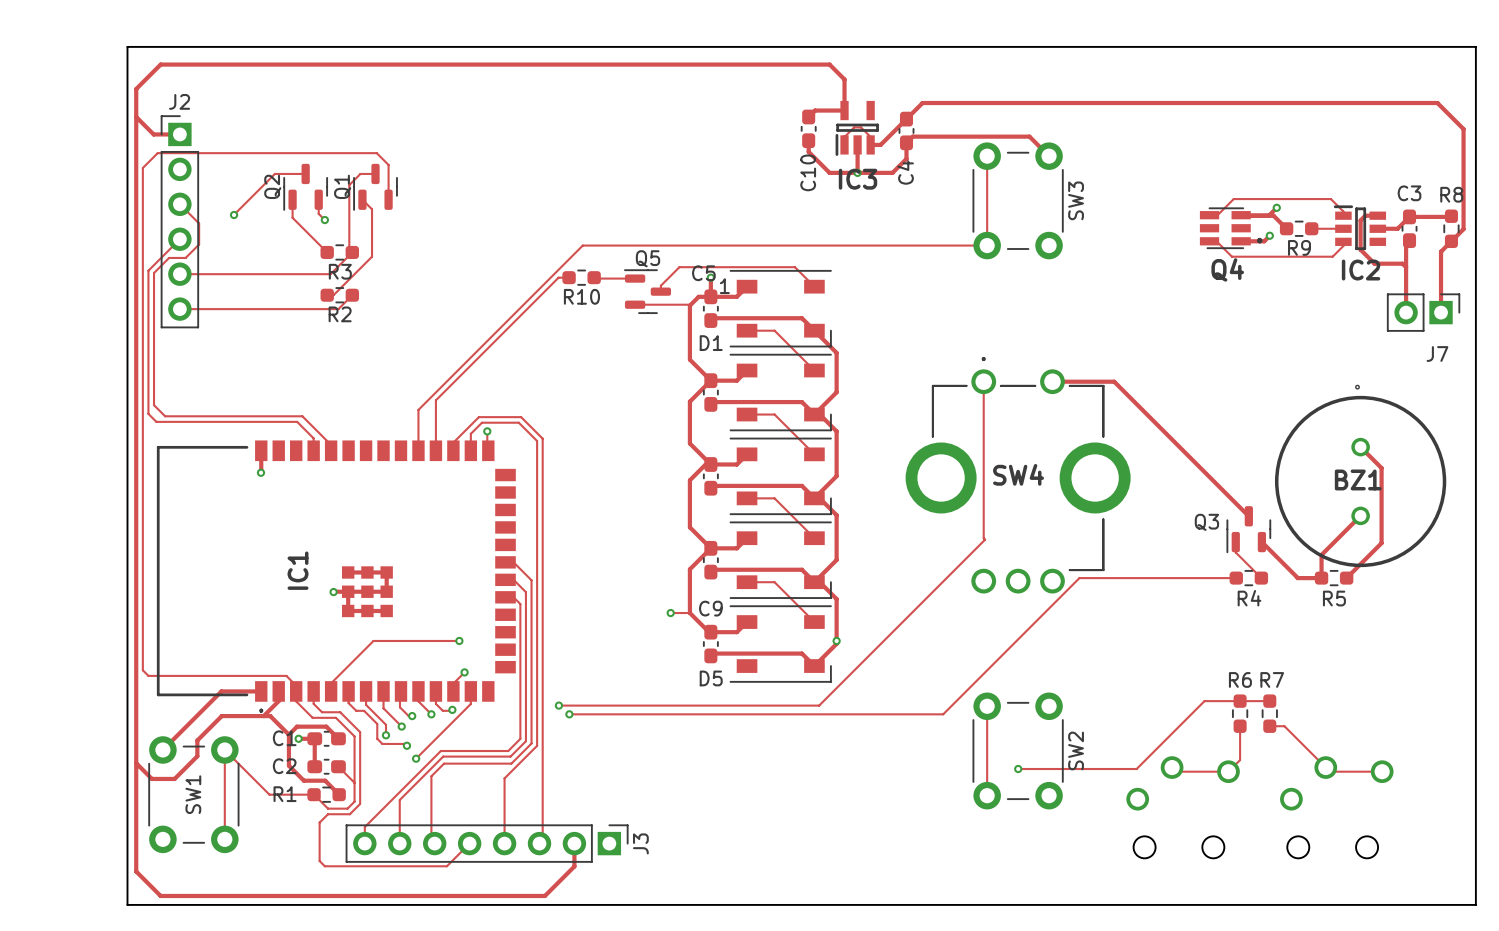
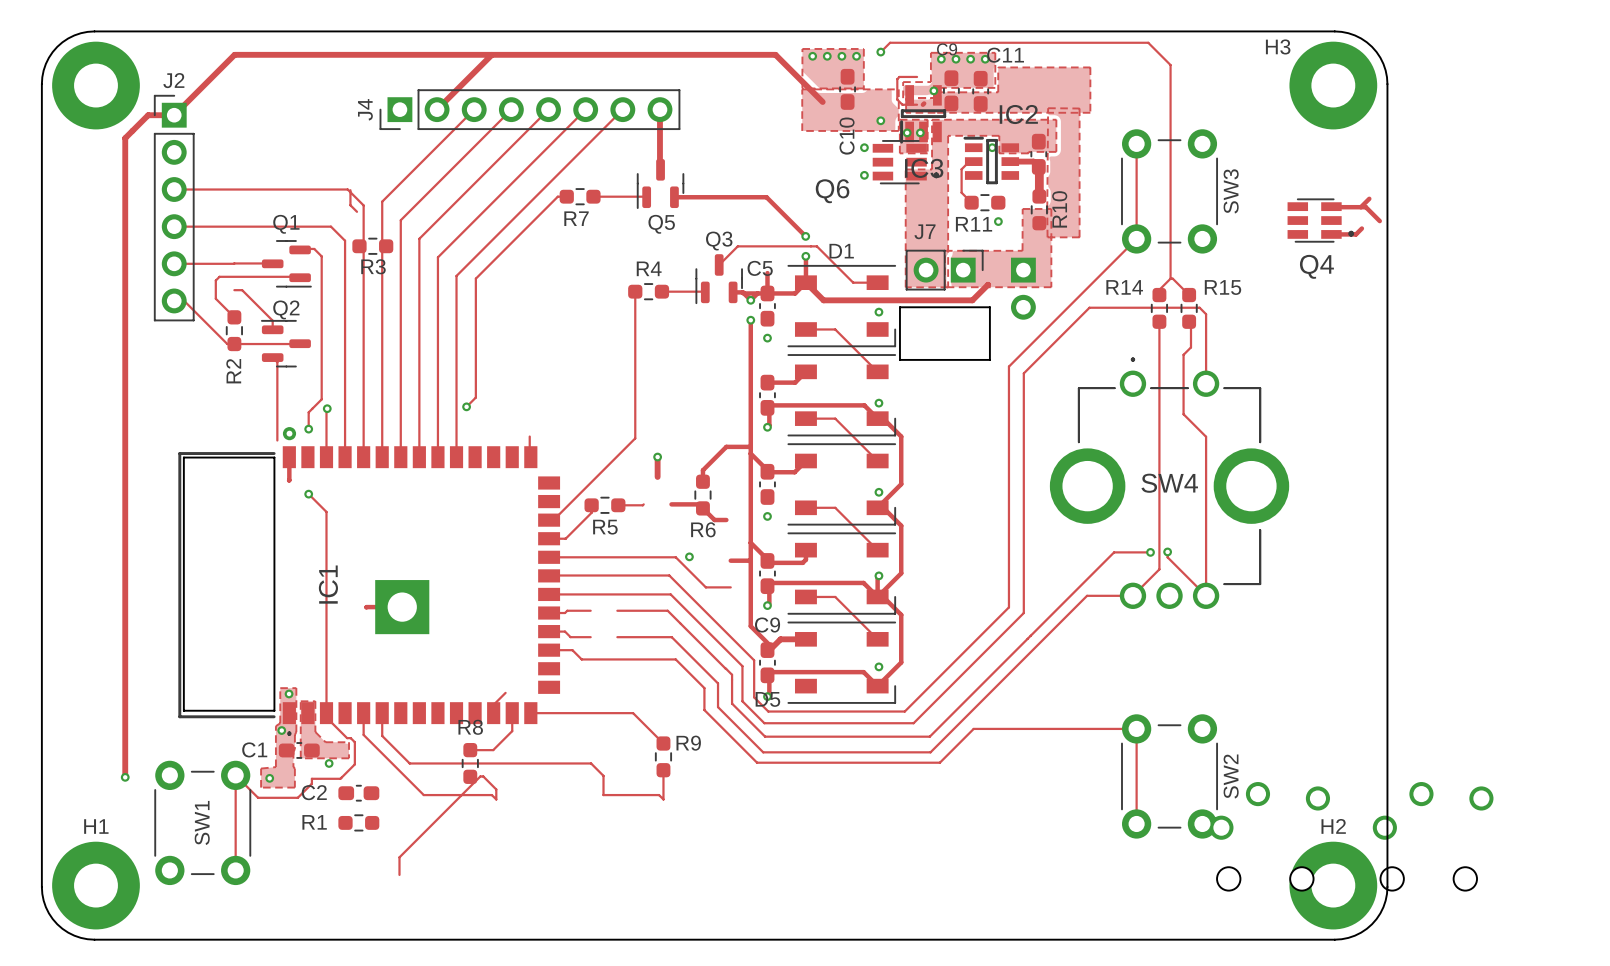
board edge: (127, 46) (1475, 46) (1475, 904) (127, 904) (127, 46) -> (94, 31) (74, 35) (57, 46) (45, 63) (41, 84) (41, 887) (43, 900) (48, 913) (62, 928) (80, 937) (94, 939) (1334, 939) (1354, 935) (1366, 928) (1376, 919) (1383, 907) (1387, 887) (1387, 84) (1385, 70) (1380, 57) (1366, 42) (1354, 35) (1334, 31) (94, 31)
zone outline: none -> (802, 48) (802, 88) (863, 88) (863, 48) (802, 48)
track: none -> (880, 52) (890, 42) (1148, 42) (1170, 65) (1170, 278)
via: none -> (880, 52)
zone outline: none -> (930, 52) (930, 82) (903, 82) (903, 98) (938, 98) (938, 87) (995, 87) (995, 52) (930, 52)
track: none -> (491, 54) (437, 109)
via: none -> (812, 56)
via: none -> (827, 56)
via: none -> (841, 56)
via: none -> (856, 56)
via: none -> (941, 59)
via: none -> (955, 59)
via: none -> (970, 59)
via: none -> (985, 59)
track: none -> (917, 76) (899, 76) (897, 79) (897, 99) (902, 104) (917, 104)
part: none -> (95, 85)
H3: none -> (1333, 85)
zone outline: none -> (802, 89) (898, 89) (898, 130) (802, 130) (802, 89)
via: none -> (933, 90)
C9: none -> (951, 90)
C11: none -> (980, 91)
zone outline: none -> (906, 98) (906, 112) (1090, 112) (1090, 67) (998, 67) (998, 92) (935, 92) (935, 98)
track: (136, 116) (153, 134) (179, 134) -> none
track: none -> (822, 101) (775, 54) (234, 54) (174, 115) (148, 115) (125, 138) (125, 777)
track: (808, 116) (815, 110) (844, 110) (844, 79) (829, 64) (160, 64) (136, 89) (136, 871) (160, 895) (544, 895) (574, 866) (574, 843) -> none
track: none -> (924, 103) (922, 104)
zone outline: none -> (1048, 108) (1047, 237) (1079, 237) (1079, 108) (1048, 108)
track: none -> (474, 109) (382, 201) (382, 457)
track: none -> (511, 109) (400, 220) (400, 457)
J4: none -> (529, 109)
track: none -> (548, 109) (419, 238) (419, 457)
track: none -> (585, 109) (437, 257) (437, 457)
track: none -> (659, 109) (660, 169)
C10 position: (808, 128) -> (847, 89)
C4: (906, 130) -> none
zone outline: none -> (899, 119) (927, 119) (927, 153) (899, 153) (899, 119)
zone outline: none -> (932, 119) (1056, 119) (1056, 151) (999, 153) (999, 135) (948, 135) (948, 287) (905, 287) (905, 169) (932, 169) (932, 119)
via: none -> (880, 120)
track: (871, 137) (861, 127) (854, 127) (844, 137) (844, 144) -> none
track: (808, 140) (808, 151) (829, 172) (892, 172) (906, 158) (906, 142) (912, 136) (1029, 136) (1049, 156) -> none
track: (857, 144) (857, 172) -> none
track: (870, 144) (880, 144) (922, 103) (1437, 103) (1463, 129) (1463, 229) (1441, 251) (1441, 312) -> none
via: none -> (907, 132)
via: none -> (920, 132)
track: (987, 156) (987, 245) (582, 245) (418, 409) -> (622, 109) (456, 275) (456, 413)
via: none -> (864, 147)
via: none -> (992, 147)
part: none -> (1038, 154)
via: (857, 172) -> none
track: none -> (973, 161) (969, 161) (961, 169) (961, 192) (971, 202)
track: none -> (1010, 161) (1033, 161) (1039, 167) (1039, 196)
track: (305, 173) (274, 173) (234, 214) -> none
track: (375, 173) (360, 173) (349, 185) (349, 249) (352, 252) (330, 274) (179, 274) -> none
Q6: none -> (905, 162)
via: none -> (864, 175)
Q1 name position: Q1 (342, 186) -> Q1 (286, 224)
Q2 rotation: 0° (305, 187) -> 90° clockwise (285, 343)
Q2 position: (305, 187) -> (285, 343)
Q1 rotation: 0° (375, 187) -> 90° counterclockwise (286, 263)
Q1 position: (375, 187) -> (286, 263)
track: (292, 199) (292, 217) (327, 252) -> none
track: (362, 199) (372, 209) (372, 256) (333, 295) (327, 295) -> none
track: (388, 199) (388, 164) (376, 153) (157, 153) (142, 167) (142, 670) (148, 675) (286, 675) (296, 685) -> (308, 494) (326, 511) (326, 706)
SW3 position: (1018, 200) -> (1169, 191)
track: (179, 204) (199, 223) (199, 244) (185, 257) (169, 257) (154, 273) (154, 405) (165, 416) (302, 416) (331, 444) -> (184, 189) (347, 189) (363, 205) (363, 451)
track: none -> (566, 196) (557, 196) (475, 278) (475, 397) (466, 406)
track: none -> (593, 196) (646, 197)
track: none -> (674, 197) (766, 197) (805, 236)
via: (1276, 207) -> none
R11: none -> (984, 202)
via: (234, 214) -> none
track: (1217, 215) (1233, 199) (1330, 199) (1343, 211) (1343, 215) -> none
track: (1377, 215) (1365, 215) (1360, 220) (1360, 249) (1374, 263) (1402, 263) (1406, 267) -> none
track: (1451, 216) (1409, 216) (1397, 228) (1377, 228) -> none
zone outline: none -> (1022, 208) (1022, 250) (945, 250) (945, 287) (1051, 287) (1051, 208) (1022, 208)
via: (324, 220) -> none
J2 position: (179, 221) -> (174, 208)
IC2 position: (1359, 227) -> (991, 160)
R9 rotation: 0° (1299, 228) -> 90° clockwise (663, 756)
R9 position: (1299, 228) -> (663, 756)
track: (1311, 228) (1343, 228) -> none
C3: (1409, 228) -> none
R8 position: (1451, 228) -> (470, 763)
via: none -> (998, 221)
via: (1269, 235) -> none
track: (179, 239) (148, 270) (148, 413) (156, 421) (297, 421) (313, 438) -> (184, 226) (330, 226) (345, 240) (345, 443)
track: (1409, 240) (1406, 244) (1406, 312) -> none
track: (1217, 241) (1231, 256) (1332, 256) (1343, 245) (1343, 241) -> none
via: none -> (805, 236)
R9 name position: R9 (1299, 247) -> R9 (688, 743)
track: none -> (300, 249) (314, 248) (321, 256) (321, 399) (308, 412) (308, 429)
Q5 name position: Q5 (647, 258) -> Q5 (661, 224)
via: none -> (805, 256)
track: none -> (805, 256) (805, 282) (823, 300) (972, 300) (987, 284)
track: none -> (184, 263) (272, 263)
IC2 name position: IC2 (1361, 270) -> IC2 (1018, 114)
track: (569, 277) (558, 277) (435, 400) (435, 450) -> none
R10 rotation: 0° (581, 277) -> 90° clockwise (1039, 209)
R10 position: (581, 277) -> (1039, 209)
track: (594, 277) (635, 278) -> none
via: (710, 277) -> none
track: none -> (300, 277) (219, 276) (215, 280) (215, 298) (234, 317)
track: none -> (1170, 278) (1189, 295)
track: none -> (1170, 278) (1159, 289) (1159, 295)
D1 text: 1 (724, 286) -> none
track: (814, 286) (794, 267) (679, 267) (660, 285) (660, 291) -> (877, 282) (853, 282) (816, 246) (737, 246) (719, 264)
Q5 rotation: 0° (647, 291) -> 90° counterclockwise (660, 183)
Q5 position: (647, 291) -> (660, 183)
part: none -> (1023, 288)
track: none -> (234, 290) (242, 290) (272, 320) (272, 329)
R2 rotation: 0° (339, 295) -> 90° clockwise (234, 330)
R2 position: (339, 295) -> (234, 330)
track: (352, 295) (338, 309) (179, 309) -> none
track: none -> (635, 291) (635, 438) (553, 520) (549, 520)
track: none -> (661, 291) (705, 292)
track: none -> (733, 292) (742, 292) (750, 300) (757, 293)
R10 name position: R10 (581, 296) -> R10 (1059, 209)
track: (698, 296) (689, 305) (689, 359) (710, 380) (689, 401) (689, 443) (710, 464) -> (754, 293) (743, 293)
track: none -> (184, 300) (227, 344) (300, 343)
via: none -> (750, 300)
track: (635, 304) (689, 304) -> none
board edge: none -> (899, 307) (899, 359) (989, 359) (989, 307) (899, 307)
R14: none -> (1159, 308)
R15: none -> (1189, 308)
J7 position: (1423, 312) -> (944, 270)
via: none -> (878, 312)
track: (710, 320) (713, 318) (801, 318) (836, 352) (836, 392) (814, 414) -> none
via: none -> (750, 320)
track: none -> (1159, 321) (1159, 569) (1132, 595) (1087, 595) (930, 752) (763, 752) (718, 707) (718, 683) (671, 637) (617, 637)
track: none -> (1189, 321) (1191, 323) (1191, 347) (1183, 354) (1183, 414) (1206, 436) (1206, 595) (1167, 557) (1167, 551)
via: none -> (767, 338)
D1 name position: D1 (711, 343) -> D1 (841, 251)
J7 name position: J7 (1437, 354) -> J7 (925, 231)
track: none -> (272, 357) (277, 362) (277, 440)
track: (983, 381) (985, 539) (819, 705) (558, 705) -> none
track: (1052, 381) (1114, 381) (1248, 516) -> none
via: none -> (878, 403)
via: none -> (466, 406)
track: none -> (769, 407) (769, 425) (767, 427)
track: none -> (327, 408) (326, 457)
via: none -> (327, 408)
via: none -> (767, 427)
via: none -> (308, 429)
via: none -> (289, 433)
via: (487, 431) -> none
IC1 footprint: [156, 440, 516, 713] -> [178, 446, 561, 736]
track: none -> (750, 447) (726, 446) (702, 470) (702, 481)
track: (1360, 447) (1381, 468) (1381, 543) (1346, 578) -> none
track: (453, 450) (453, 442) (478, 417) (521, 417) (542, 438) (542, 840) (539, 843) -> none
track: (470, 450) (470, 433) (481, 422) (518, 422) (537, 441) (537, 745) (504, 778) (504, 843) -> none
track: none -> (657, 457) (657, 476)
via: none -> (657, 457)
board edge: none -> (183, 457) (274, 457) (274, 710) (183, 710) (183, 457)
track: (736, 464) (705, 464) (689, 480) (689, 527) (710, 548) -> (795, 471) (769, 472) (750, 453)
via position: (260, 472) -> (308, 494)
SW4 position: (1018, 475) -> (1169, 483)
BZ1: (1360, 475) -> none
via: none -> (878, 492)
track: (710, 488) (713, 485) (801, 485) (814, 498) -> none
track: none -> (643, 504) (618, 505)
track: none -> (671, 504) (698, 504) (714, 520) (726, 520)
track: none -> (591, 505) (591, 512) (565, 538) (549, 538)
via: none -> (767, 516)
track: (1360, 515) (1321, 554) (1321, 578) (1297, 578) -> none
Q3 name position: Q3 (1206, 522) -> Q3 (719, 241)
Q3 position: (1248, 529) -> (719, 279)
track: (747, 538) (736, 548) (710, 548) -> (805, 550) (805, 559) (802, 562) (770, 562) (750, 542)
via: none -> (1167, 551)
track: none -> (1150, 552) (1114, 552) (929, 736) (765, 736) (732, 703) (732, 674) (726, 668)
via: none -> (1150, 552)
track: (1235, 542) (1235, 552) (1261, 578) -> none
track: (1261, 542) (1297, 577) -> none
track: none -> (549, 557) (675, 557) (705, 587) (730, 587)
via: none -> (689, 556)
track: none -> (730, 560) (750, 561)
track: (710, 548) (689, 569) (689, 613) -> none
track: (509, 562) (513, 562) (531, 580) (531, 743) (511, 763) (444, 763) (431, 776) (431, 840) (434, 843) -> (553, 575) (669, 575) (754, 660) (754, 697) (768, 711) (904, 711) (1008, 607) (1008, 366) (1136, 238) (1136, 143)
track: none -> (878, 575) (877, 596)
via: none -> (878, 575)
track: (801, 569) (713, 569) (710, 572) -> (864, 583) (773, 582) (769, 586) (769, 603)
track: (1236, 578) (1079, 578) (943, 714) (569, 714) -> none
R4 position: (1248, 578) -> (648, 291)
R5 position: (1334, 578) -> (604, 505)
track: (513, 579) (525, 592) (525, 741) (510, 756) (443, 756) (399, 800) (399, 843) -> (557, 594) (670, 594) (742, 666) (742, 701) (764, 723) (913, 723) (1023, 613) (1023, 373) (1089, 307) (1199, 307) (1206, 314) (1206, 383)
via: none -> (767, 605)
via: (333, 592) -> none
track: none -> (617, 610) (667, 610) (725, 668)
track: (513, 597) (520, 604) (520, 738) (508, 751) (443, 751) -> (557, 613) (565, 613) (567, 610) (590, 610)
R4 name position: R4 (1249, 598) -> R4 (649, 268)
track: (670, 613) (689, 613) -> none
via: (670, 613) -> none
track: (689, 613) (709, 632) (736, 632) (747, 622) -> (750, 320) (750, 626) (769, 644) (769, 650) (780, 639) (805, 639)
track: none -> (549, 631) (565, 631) (570, 637) (590, 637)
track: none -> (549, 650) (572, 650) (581, 659) (675, 659) (704, 688) (704, 710) (757, 762) (939, 762) (973, 728) (1136, 728) (1136, 823)
track: (459, 640) (373, 640) (331, 683) (331, 691) -> (483, 776) (496, 789) (496, 799) (491, 795) (423, 795) (363, 734) (363, 713)
via: (459, 640) -> none
via position: (836, 640) -> (878, 666)
track: (801, 653) (713, 653) (710, 655) -> (864, 672) (773, 672) (769, 675) (769, 694) (767, 696)
zone outline: none -> (280, 688) (280, 723) (275, 726) (275, 767) (261, 768) (261, 787) (294, 787) (293, 751) (296, 732) (296, 688) (280, 688)
via: (464, 672) -> none
via: none -> (289, 693)
via: none -> (767, 696)
R6 name position: R6 (1240, 679) -> R6 (703, 529)
R7 name position: R7 (1272, 679) -> R7 (576, 218)
zone outline: none -> (300, 701) (300, 758) (349, 758) (349, 742) (325, 742) (315, 732) (315, 701) (300, 701)
track: (261, 691) (221, 691) (162, 749) -> none
track: (278, 691) (278, 701) (263, 716) -> none
track: (313, 691) (313, 703) (322, 712) (340, 712) (360, 732) (360, 803) (349, 814) (328, 814) (319, 822) (319, 861) (324, 866) (446, 866) (469, 843) -> none
track: (366, 691) (366, 704) (386, 724) (386, 735) -> none
track: (383, 691) (383, 708) (401, 726) -> none
track: (400, 691) (399, 707) (408, 716) (412, 716) -> none
track: (418, 691) (418, 701) (431, 714) -> none
track: (435, 691) (435, 703) (442, 710) (452, 709) -> none
track: none -> (530, 713) (633, 713) (663, 743)
track: (296, 695) (296, 701) (312, 717) (335, 717) (354, 736) (354, 801) (347, 808) (328, 808) (314, 794) (269, 794) (224, 749) (224, 839) -> (326, 717) (347, 738) (350, 738) (354, 742) (354, 764) (340, 778) (311, 778) (311, 783) (297, 797) (258, 797) (235, 775) (235, 870)
track: (1269, 701) (1204, 701) (1136, 769) (1018, 769) -> none
track: (348, 703) (356, 710) (364, 710) (377, 723) (377, 738) (382, 743) (405, 743) (406, 745) -> (382, 725) (382, 735) (409, 763) (591, 763) (603, 775) (603, 795) (659, 795) (663, 799) (663, 770)
track: (470, 703) (416, 758) -> (512, 726) (512, 731) (493, 750) (470, 750)
via: (558, 705) -> none
track: (987, 706) (987, 795) -> none
via: none -> (281, 730)
via: (452, 709) -> none
R6 position: (1240, 713) -> (702, 495)
R7 rotation: 0° (1269, 713) -> 90° clockwise (580, 196)
R7 position: (1269, 713) -> (580, 196)
via: (431, 714) -> none
via: (569, 714) -> none
via: (412, 716) -> none
via: (401, 726) -> none
track: (1240, 726) (1240, 760) (1228, 771) (1176, 771) (1172, 767) -> none
track: (1269, 726) (1284, 726) (1329, 771) (1382, 771) -> none
track: (288, 734) (288, 765) (303, 780) (325, 780) (339, 794) -> none
track: (288, 734) (270, 716) (221, 716) (197, 740) (197, 756) (174, 778) (151, 778) (136, 763) -> none
track: (288, 734) (297, 726) (326, 726) (338, 738) -> none
via: (386, 735) -> none
track: (298, 738) (314, 738) (314, 766) -> none
C1 position: (326, 738) -> (299, 750)
via: (406, 745) -> none
SW2 position: (1018, 750) -> (1169, 776)
via: none -> (125, 777)
via: none -> (269, 778)
via: (416, 758) -> none
track: (338, 766) (354, 782) -> none
via: (1018, 769) -> none
SW1 position: (193, 794) -> (202, 822)
J3: (487, 843) -> none
H1: none -> (95, 885)
H2: none -> (1333, 885)

